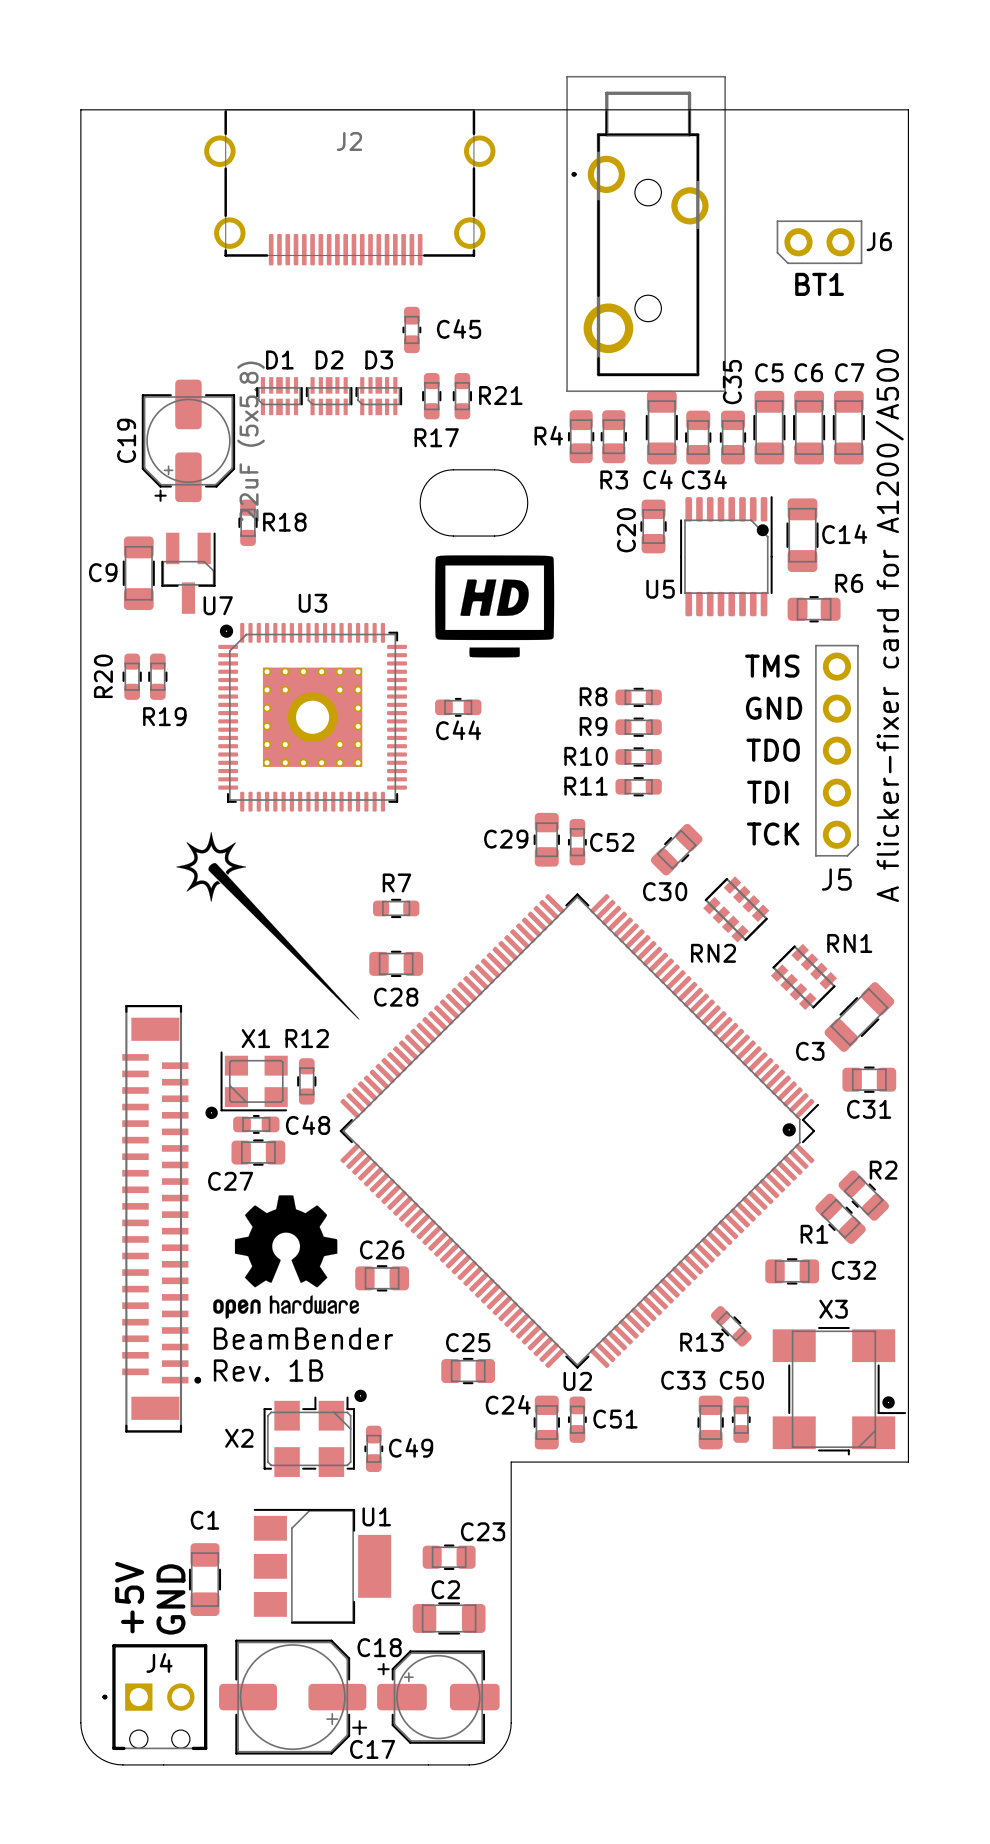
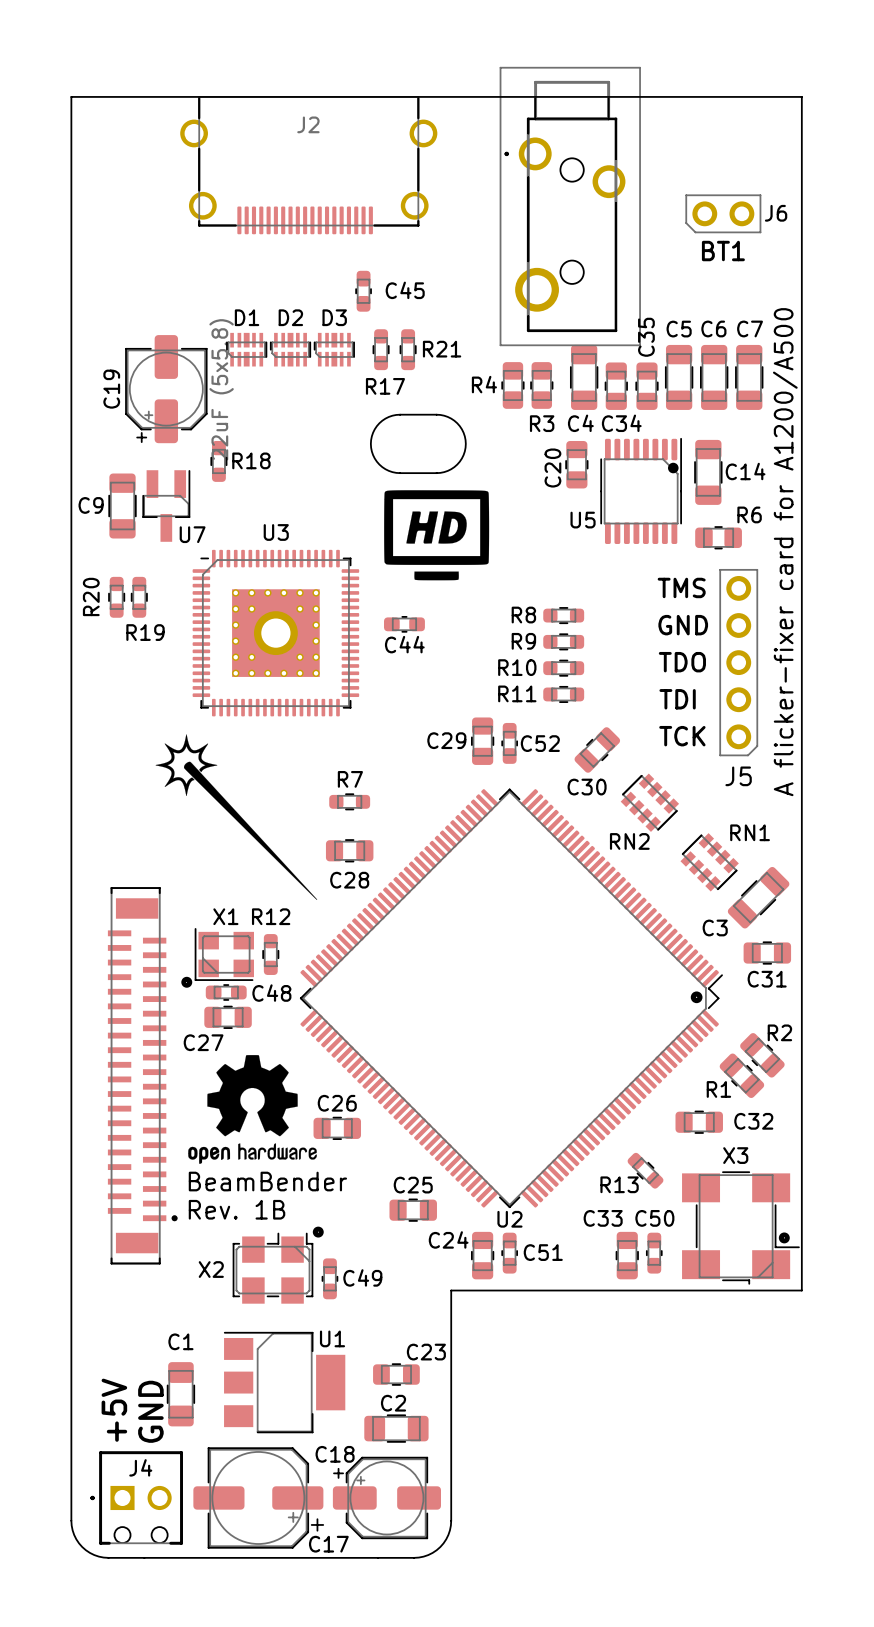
U3 footprint: [218, 622, 407, 812] -> [192, 549, 360, 717]

